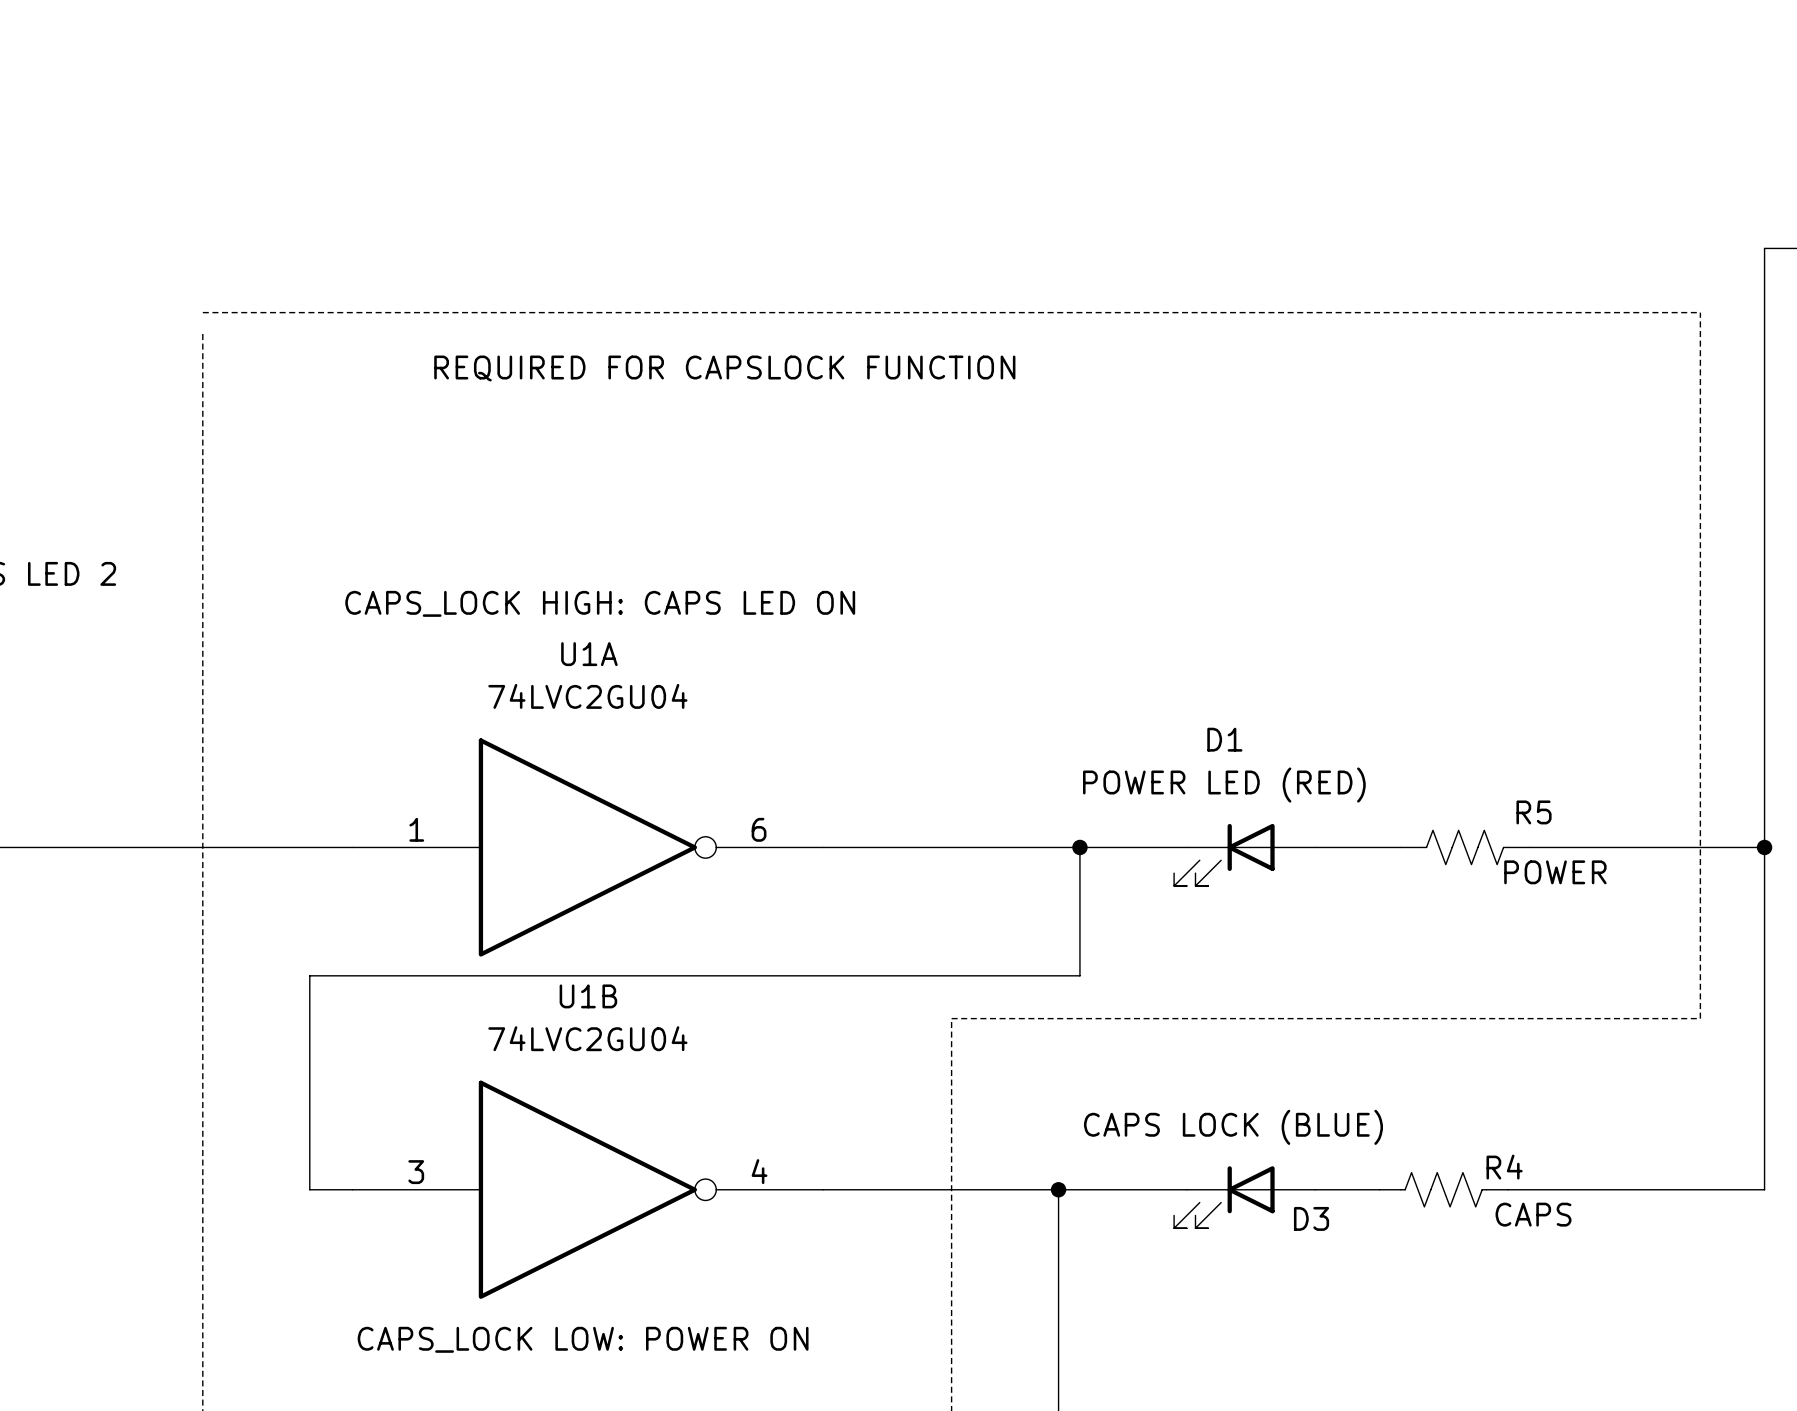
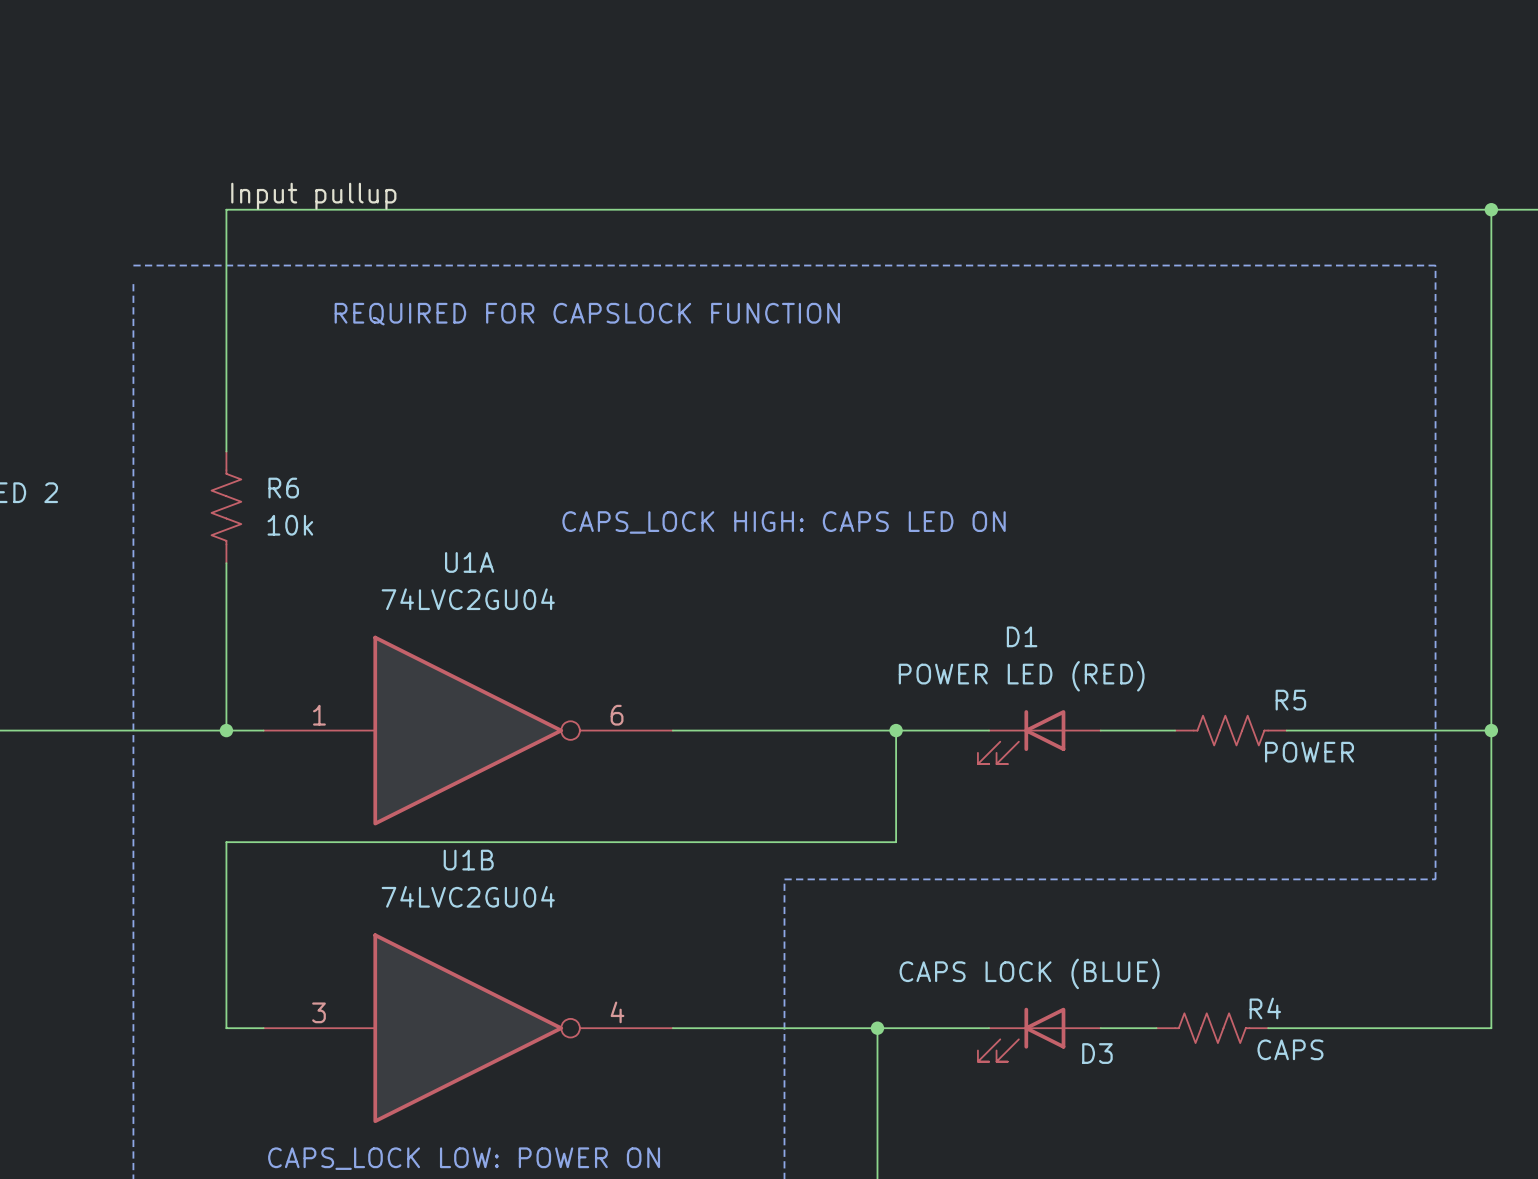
label: none -> Input pullup (313, 196)
wire: none -> (1491, 209) (226, 209) (226, 451)
junction: none -> (1491, 209)
R6: none -> 10k (226, 507)
text position: CAPS_LOCK HIGH: CAPS LED ON (600, 603) -> CAPS_LOCK HIGH: CAPS LED ON (784, 522)
wire: none -> (226, 563) (226, 730)
junction: none -> (226, 730)

